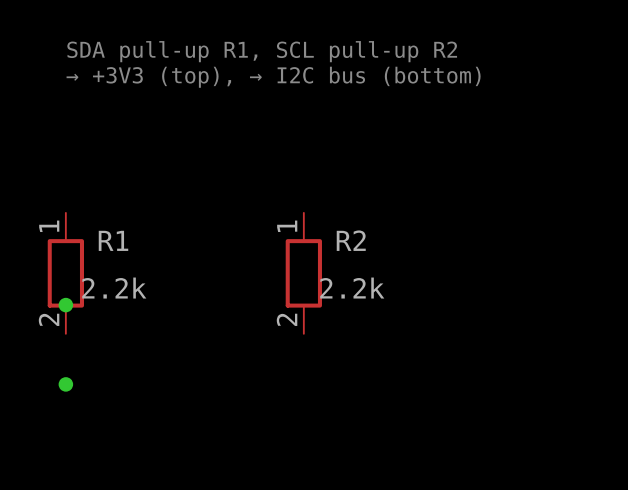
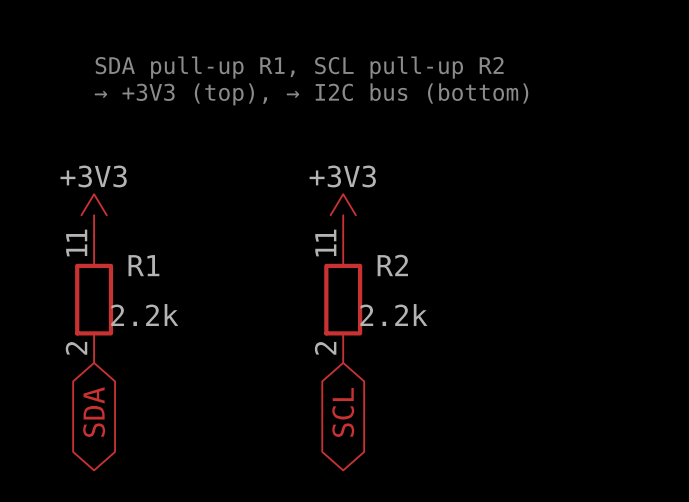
power symbol: none -> +3V3 (94, 215)
power symbol: none -> +3V3 (343, 215)
junction: (65, 305) -> none
global label: none -> SDA (94, 412)
global label: none -> SCL (343, 412)
junction: (65, 384) -> none

